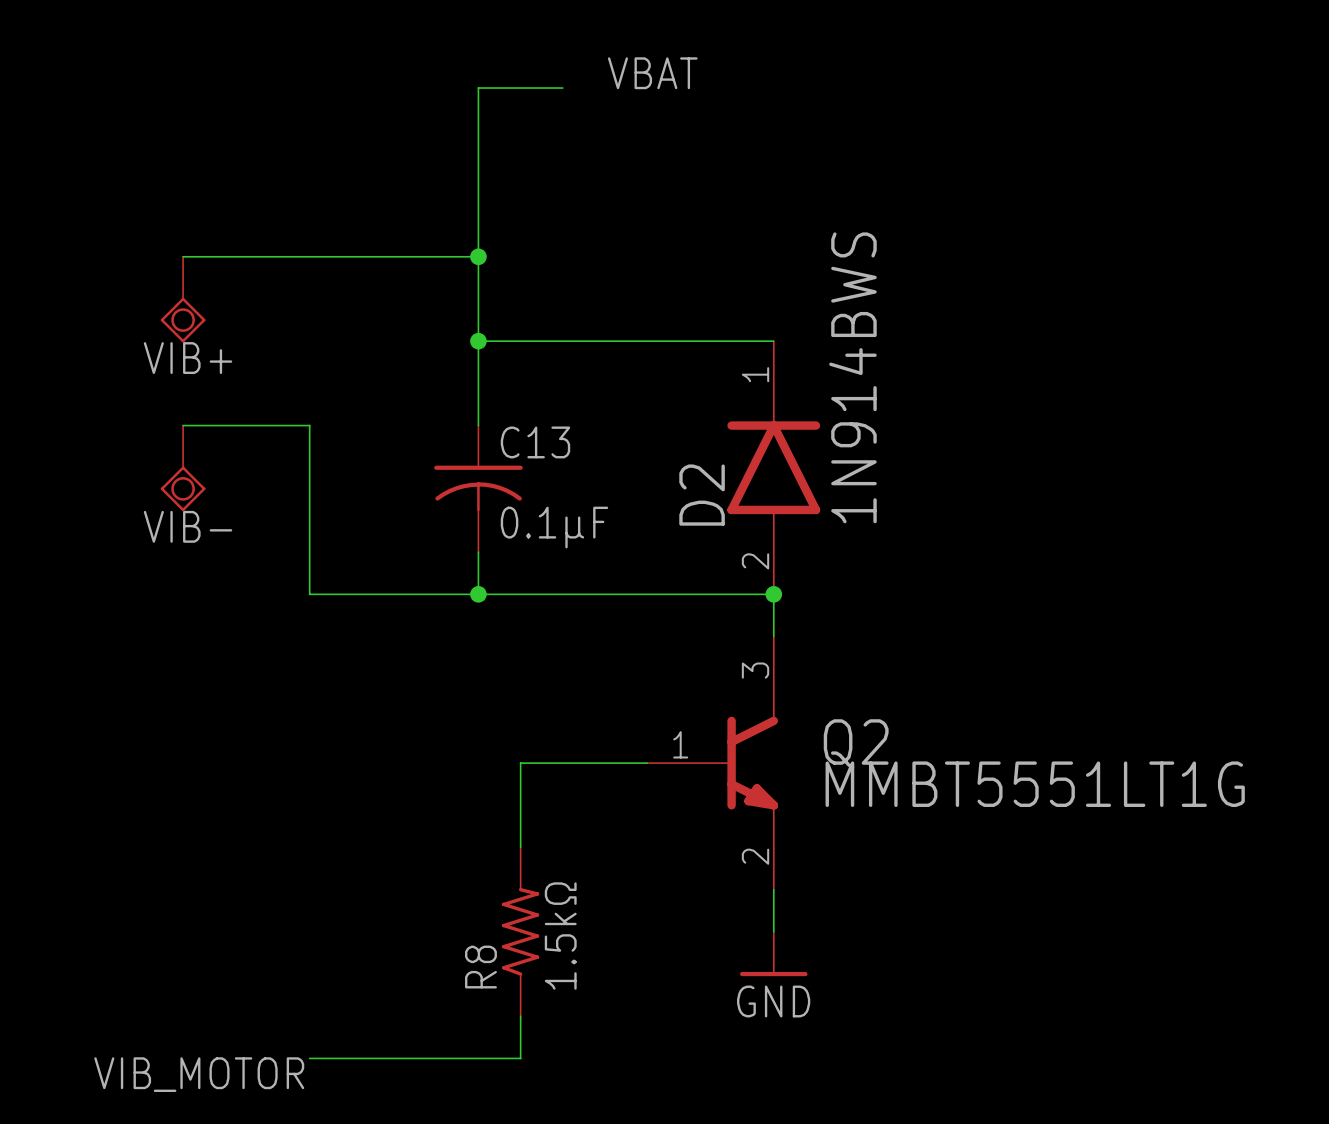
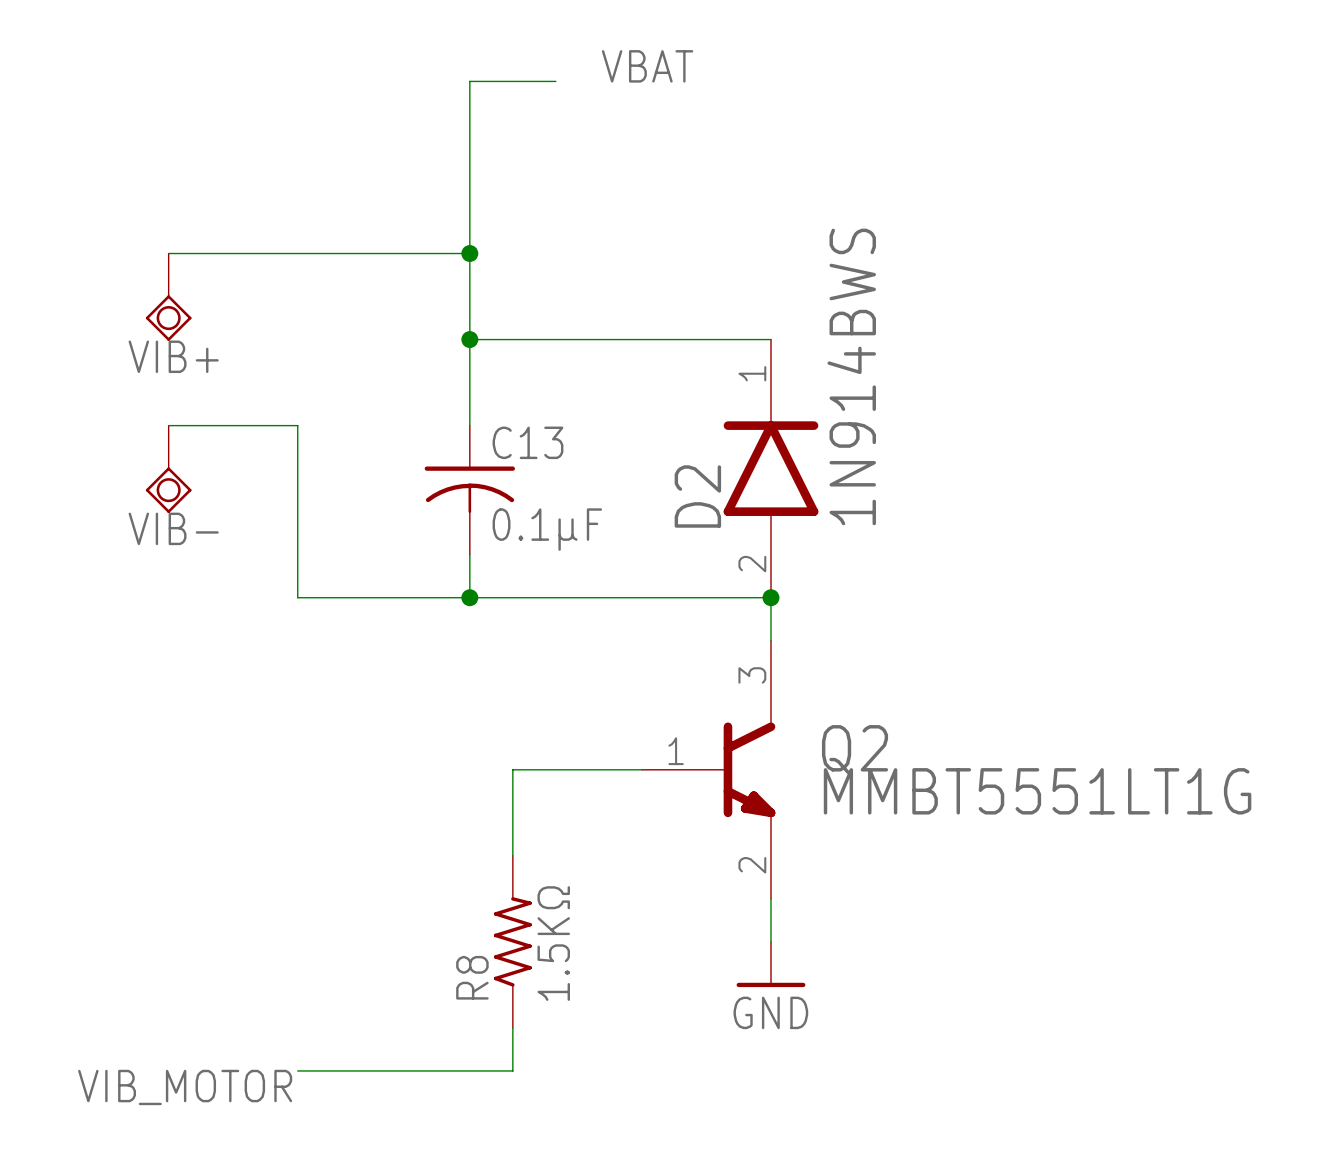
R8 value: 1.5kΩ (560, 936) -> 1.5KΩ (553, 943)

